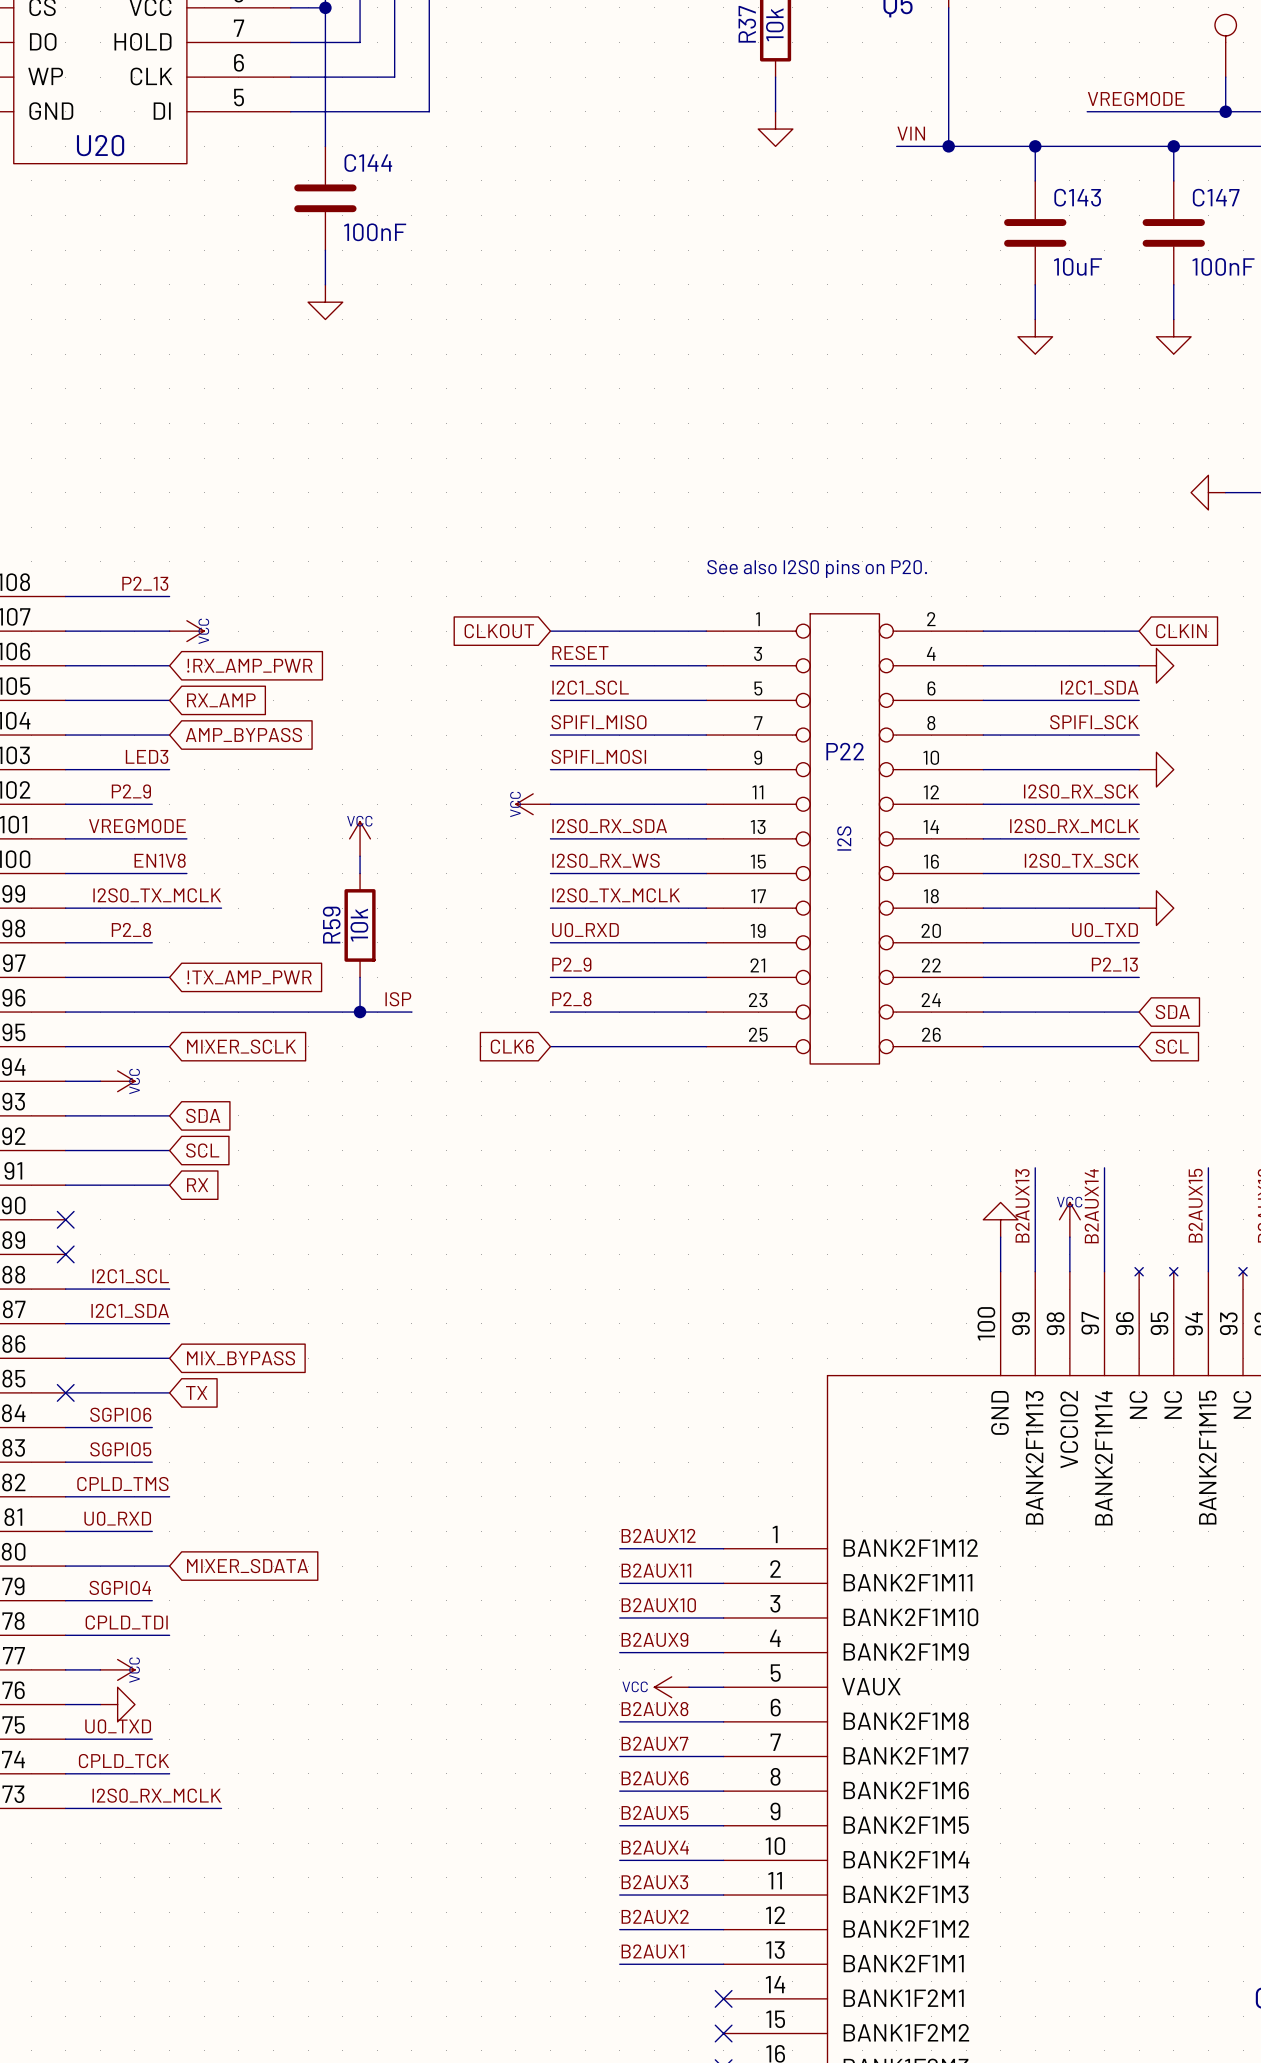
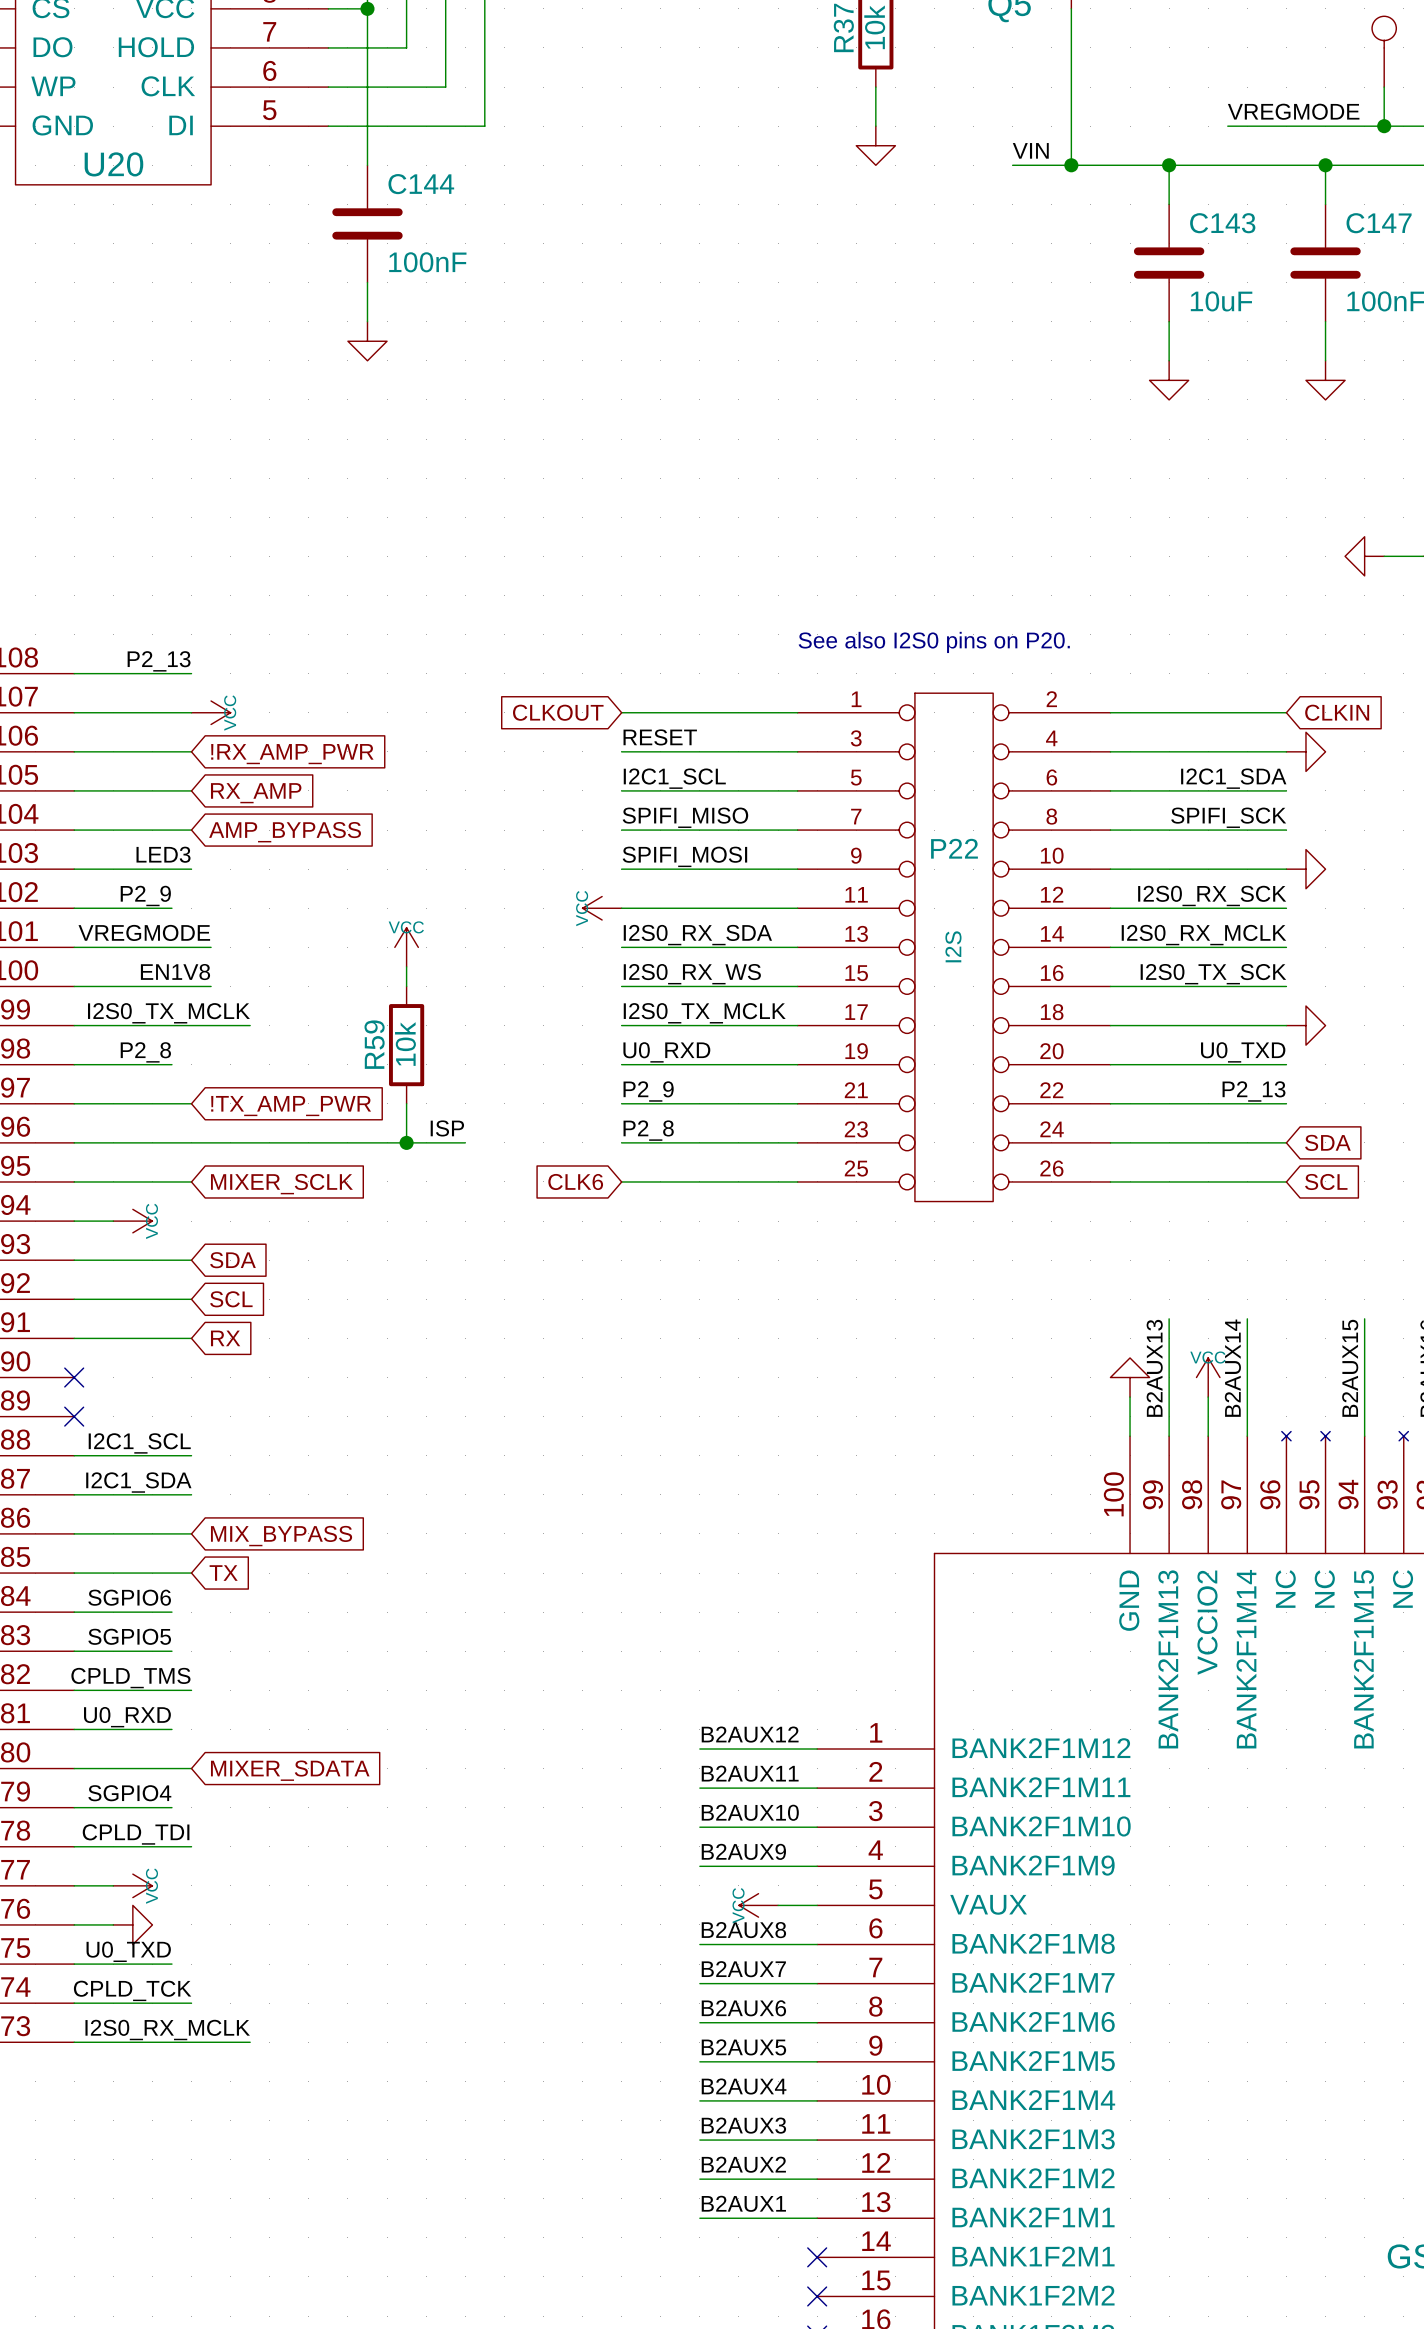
no-connect mark: (65, 1392) -> none
power symbol text rotation: 0° (635, 1686) -> 90° counterclockwise (738, 1905)

